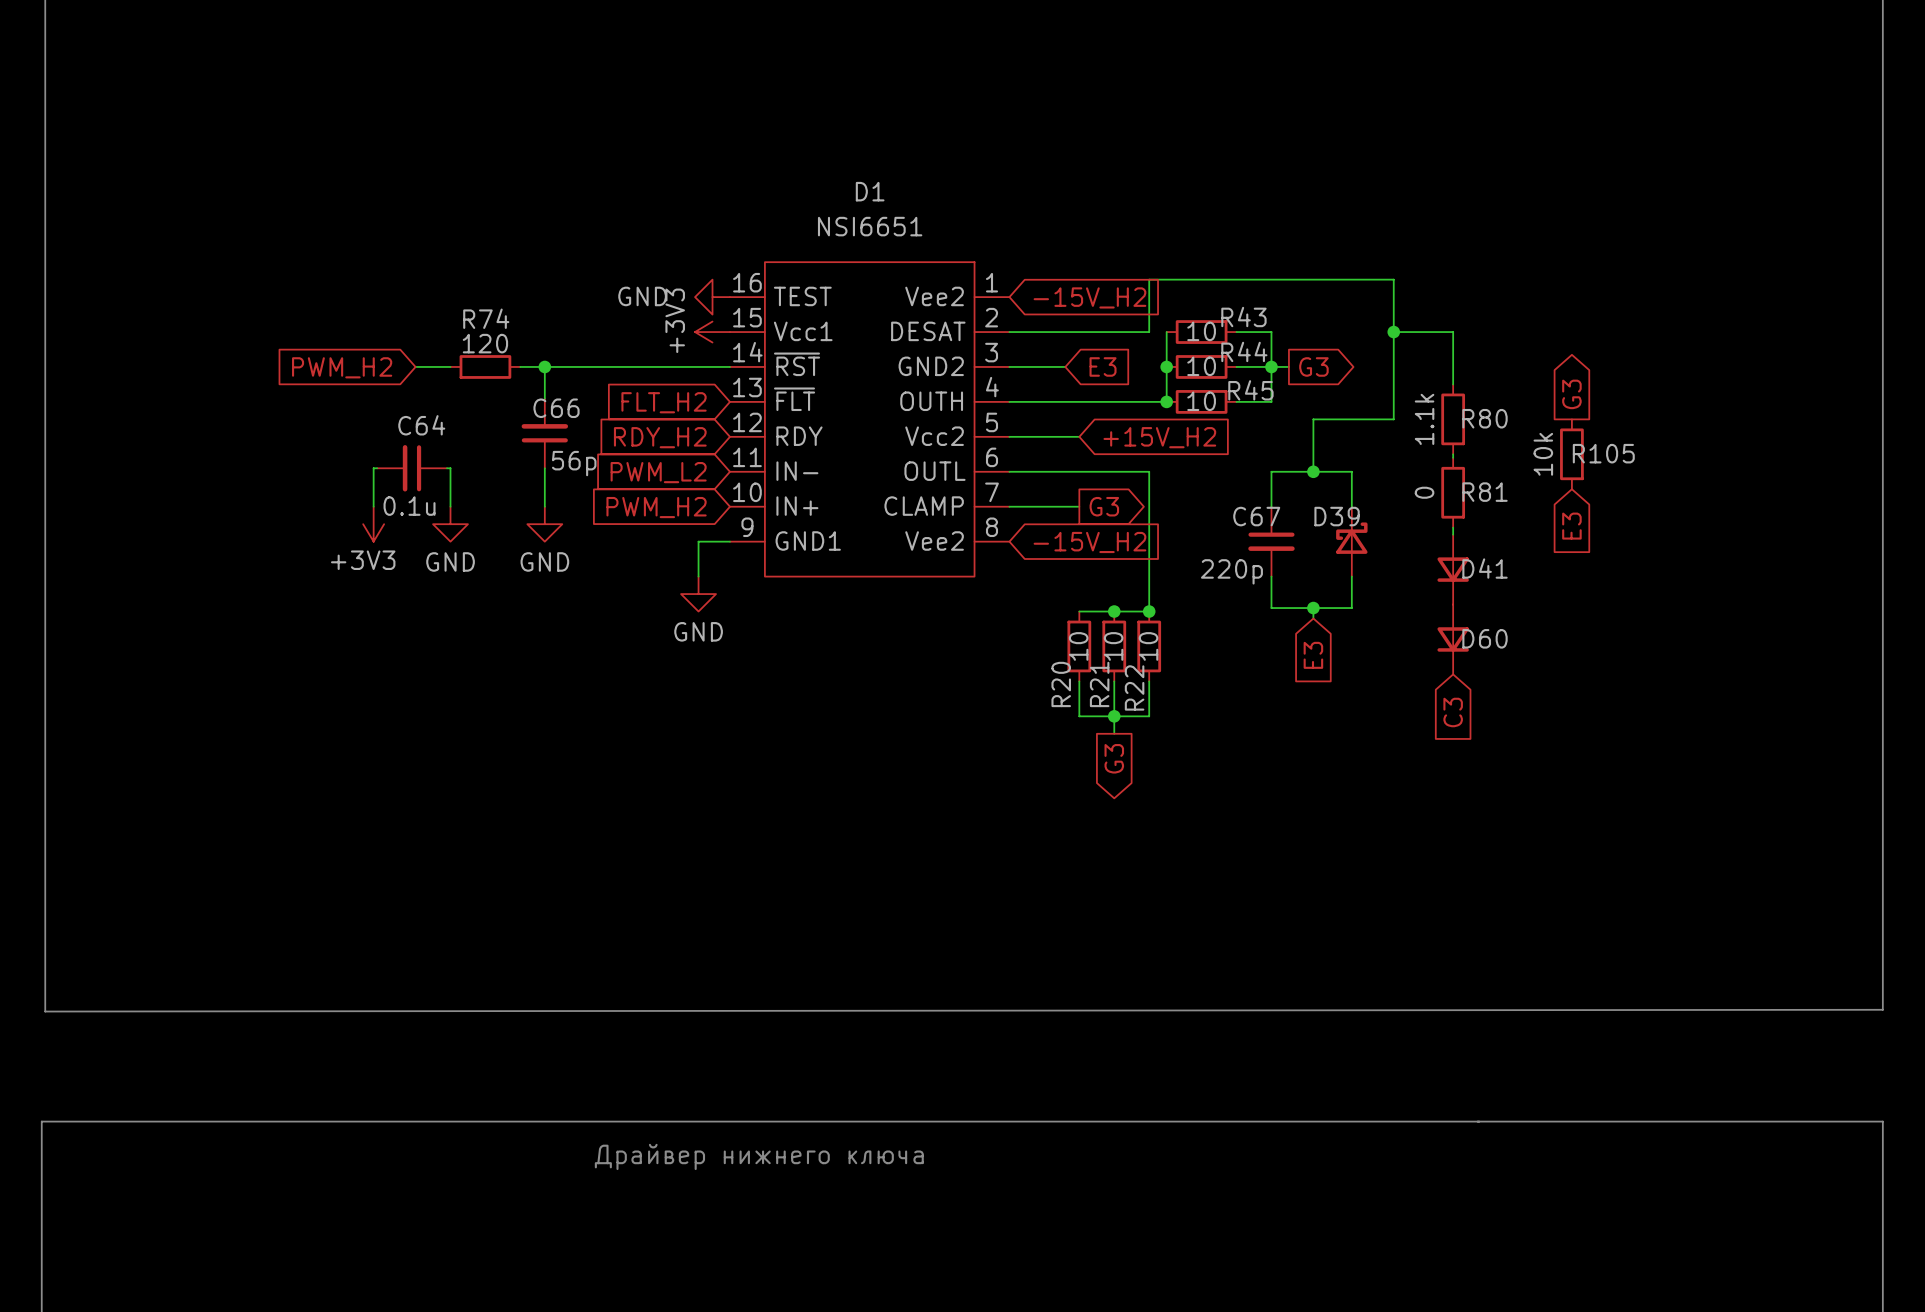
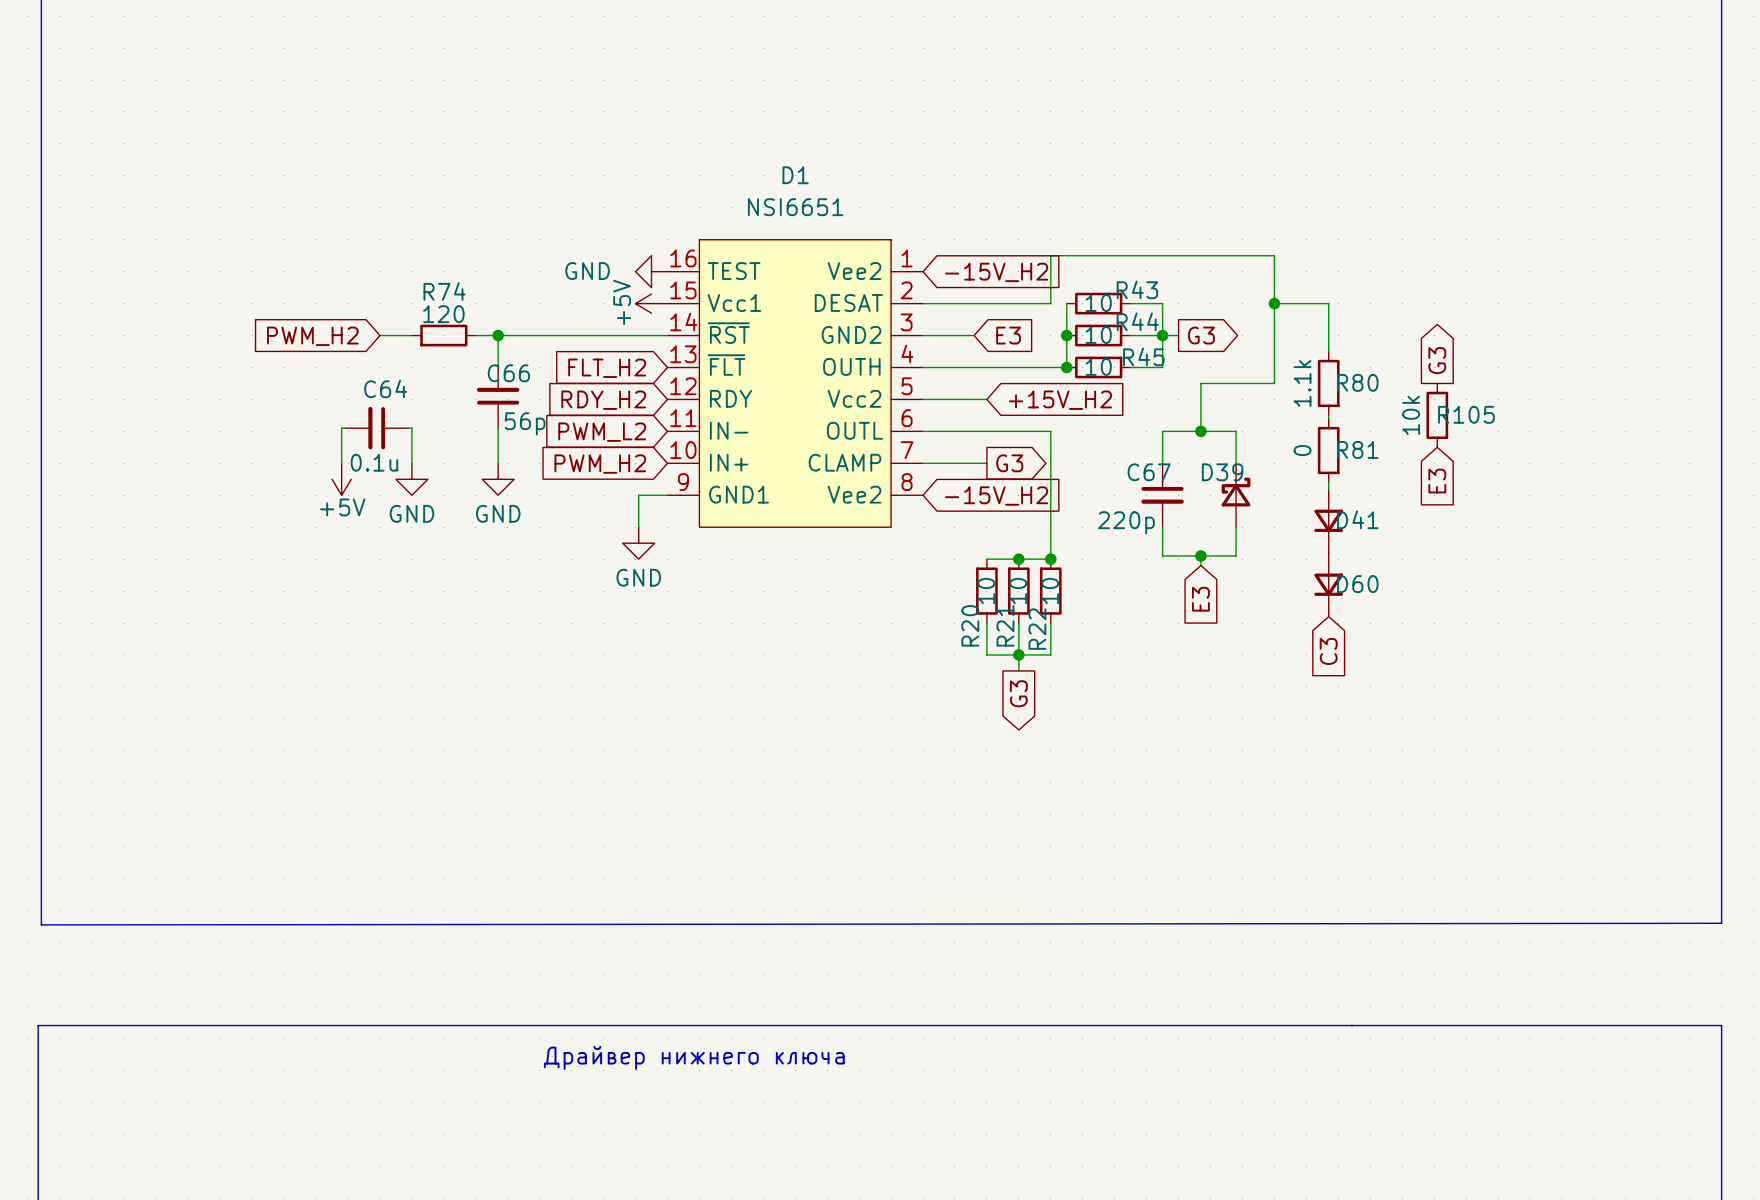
power symbol: +3V3 (712, 332) -> +5V (651, 303)
power symbol: +3V3 (373, 524) -> +5V (341, 479)

